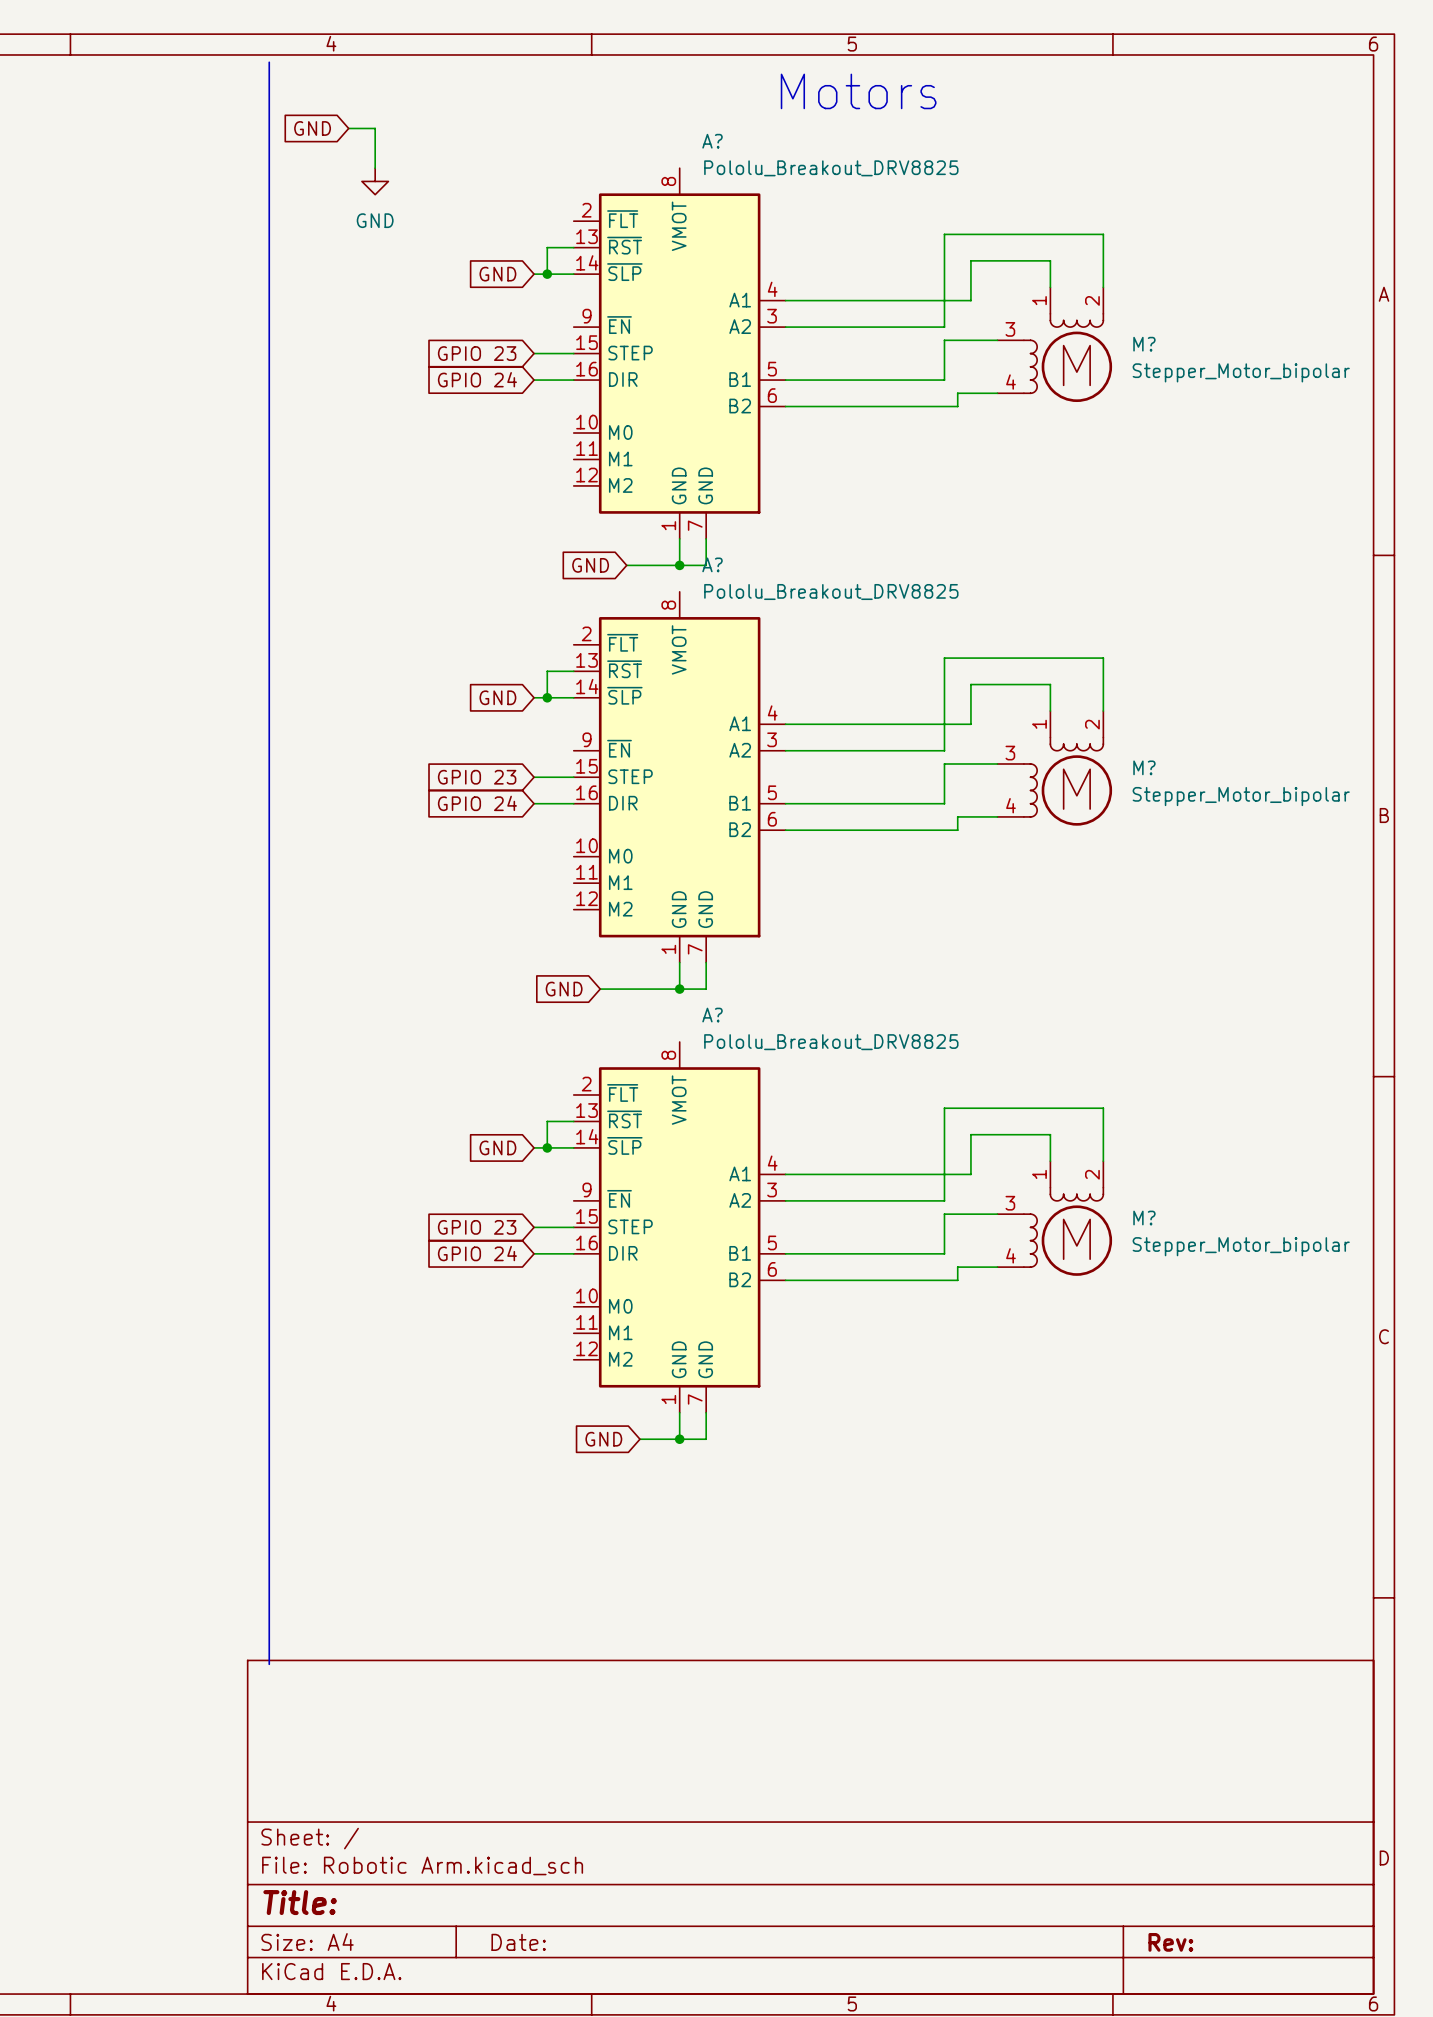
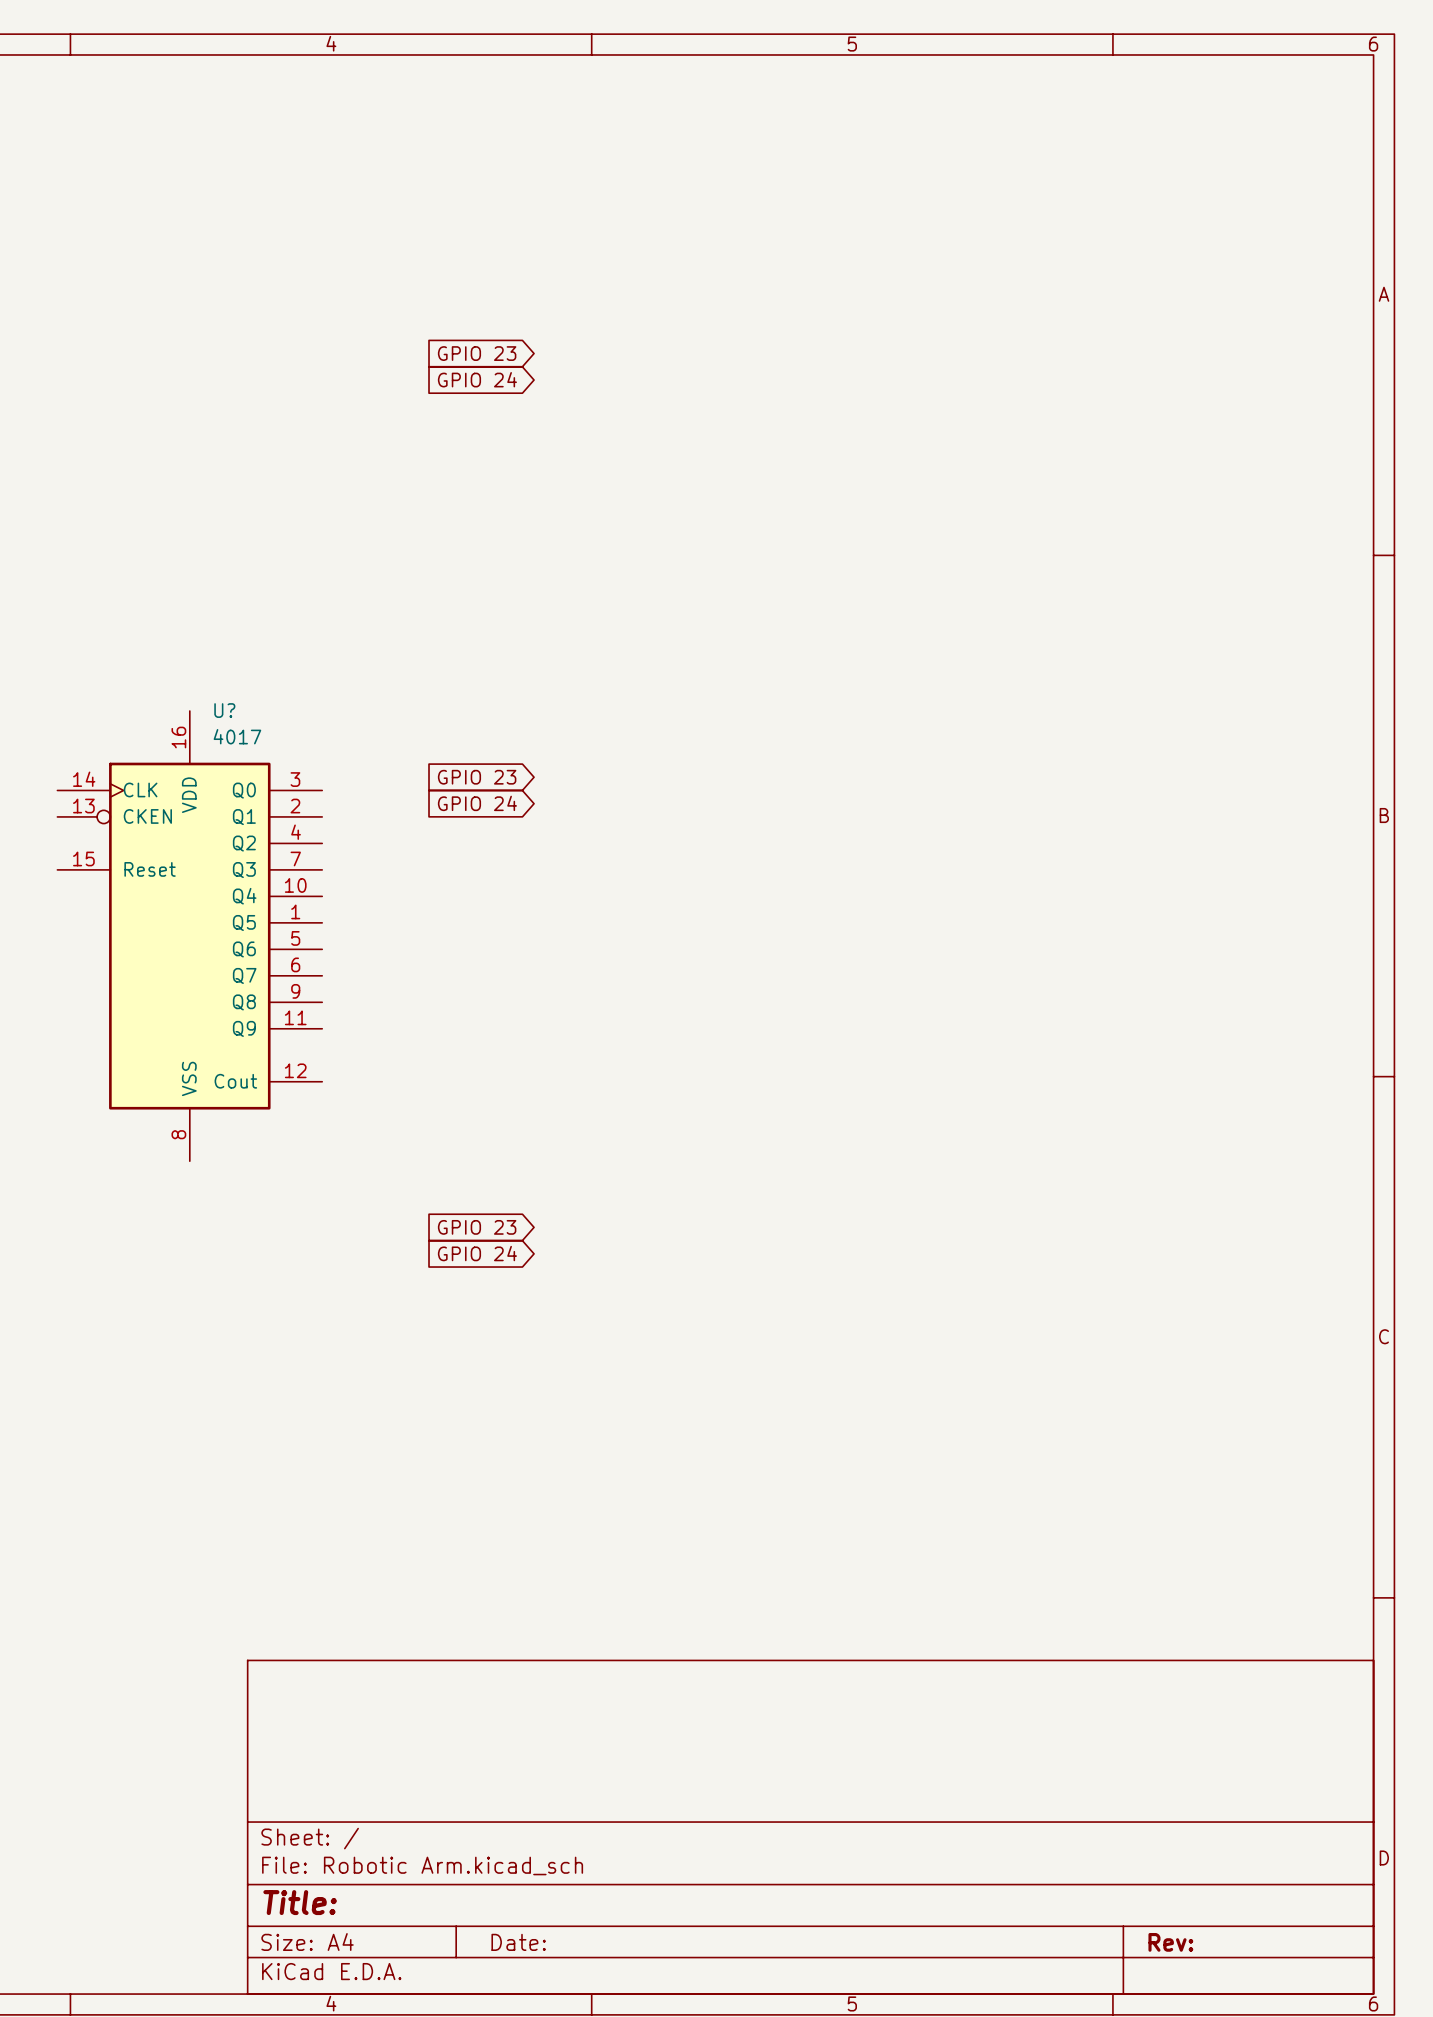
line: (269, 62) (269, 1664) -> none
text: Motors (858, 91) -> none
global label: GND (312, 128) -> none
wire: (348, 128) (375, 128) (375, 168) -> none
power symbol: GND (375, 181) -> none
wire: (573, 247) (547, 247) (547, 274) -> none
global label: GND (497, 274) -> none
wire: (534, 274) (573, 274) -> none
junction: (547, 274) -> none
wire: (1050, 287) (1050, 260) (970, 260) (970, 300) (785, 300) -> none
wire: (1103, 287) (1103, 234) (944, 234) (944, 327) (785, 327) -> none
wire: (997, 340) (944, 340) (944, 380) (785, 380) -> none
M?: Stepper_Motor_bipolar (1054, 344) -> none
wire: (534, 353) (573, 353) -> none
A?: Pololu_Breakout_DRV8825 (679, 353) -> none
wire: (534, 380) (573, 380) -> none
wire: (997, 393) (957, 393) (957, 406) (785, 406) -> none
wire: (679, 538) (679, 565) -> none
wire: (706, 538) (706, 565) (626, 565) -> none
global label: GND (590, 565) -> none
junction: (679, 565) -> none
wire: (573, 671) (547, 671) (547, 697) -> none
global label: GND (497, 697) -> none
wire: (534, 697) (573, 697) -> none
junction: (547, 697) -> none
wire: (1050, 711) (1050, 684) (970, 684) (970, 724) (785, 724) -> none
wire: (1103, 711) (1103, 658) (944, 658) (944, 750) (785, 750) -> none
wire: (997, 763) (944, 763) (944, 803) (785, 803) -> none
M?: Stepper_Motor_bipolar (1054, 768) -> none
wire: (534, 777) (573, 777) -> none
A?: Pololu_Breakout_DRV8825 (679, 777) -> none
wire: (534, 803) (573, 803) -> none
wire: (997, 816) (957, 816) (957, 830) (785, 830) -> none
U?: none -> 4017 (189, 936)
wire: (679, 962) (679, 989) -> none
wire: (706, 962) (706, 989) (600, 989) -> none
global label: GND (564, 989) -> none
junction: (679, 989) -> none
wire: (573, 1121) (547, 1121) (547, 1147) -> none
global label: GND (497, 1147) -> none
wire: (534, 1147) (573, 1147) -> none
junction: (547, 1147) -> none
wire: (1050, 1161) (1050, 1134) (970, 1134) (970, 1174) (785, 1174) -> none
wire: (1103, 1161) (1103, 1108) (944, 1108) (944, 1200) (785, 1200) -> none
wire: (997, 1214) (944, 1214) (944, 1253) (785, 1253) -> none
M?: Stepper_Motor_bipolar (1054, 1218) -> none
wire: (534, 1227) (573, 1227) -> none
A?: Pololu_Breakout_DRV8825 (679, 1227) -> none
wire: (534, 1253) (573, 1253) -> none
wire: (997, 1267) (957, 1267) (957, 1280) (785, 1280) -> none
wire: (679, 1412) (679, 1439) -> none
wire: (706, 1412) (706, 1439) (639, 1439) -> none
global label: GND (603, 1439) -> none
junction: (679, 1439) -> none

